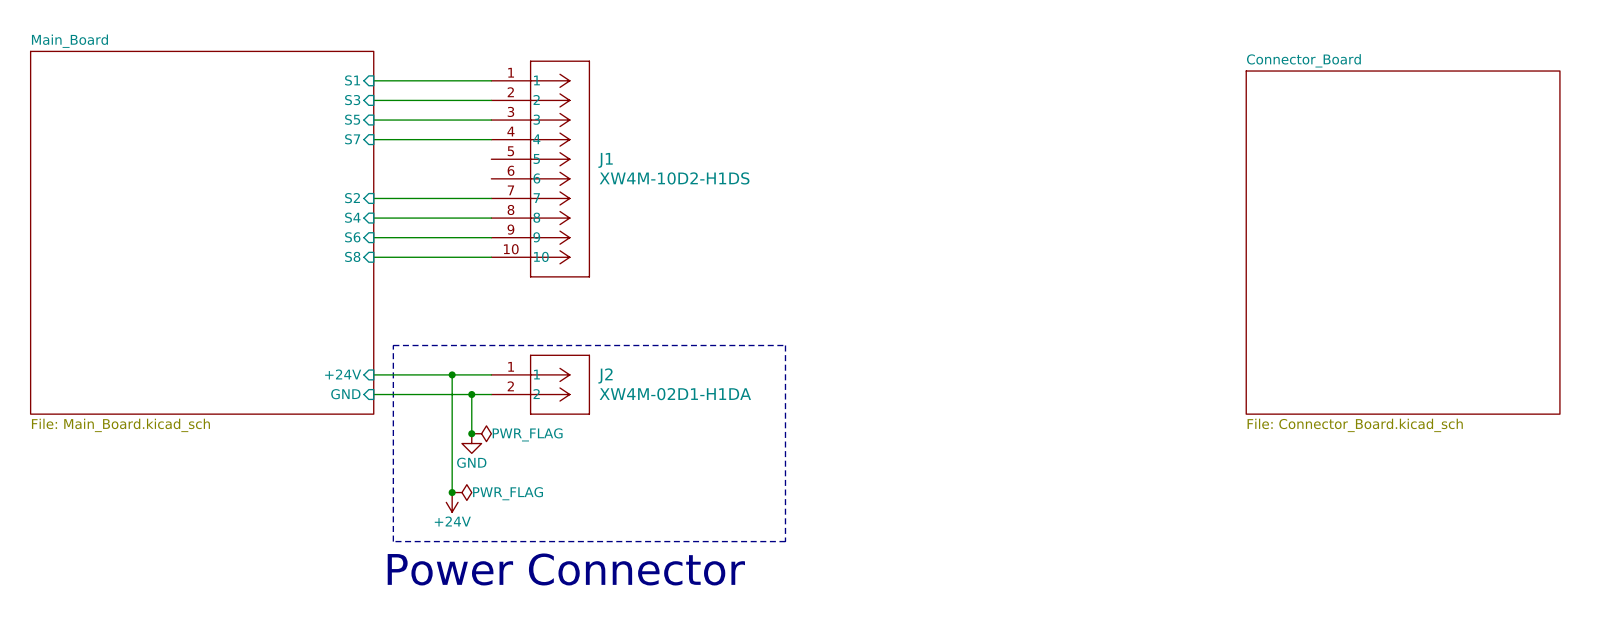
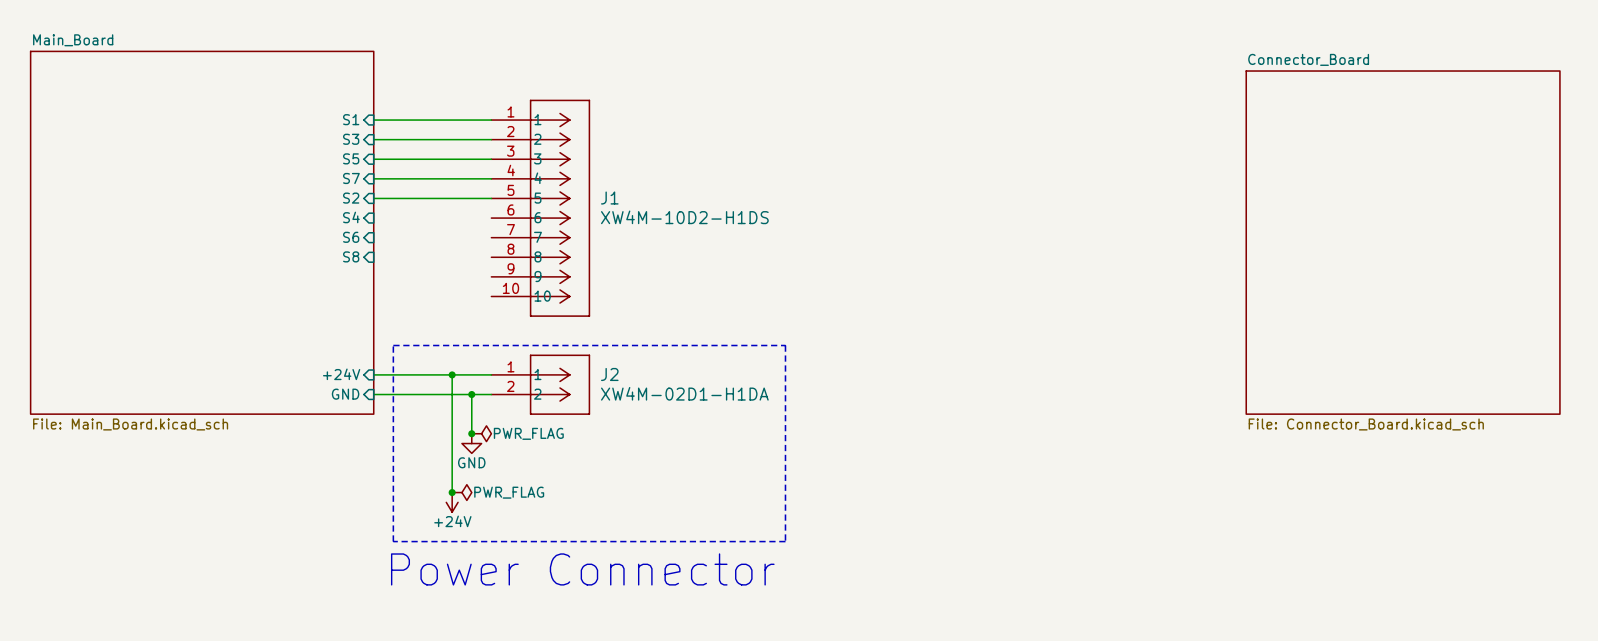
sheet pin: S1 (352, 80) -> none
wire: (373, 80) (491, 80) -> none
sheet pin: S3 (352, 100) -> none
wire: (373, 100) (491, 100) -> none
sheet pin: S5 (352, 119) -> S1 (351, 119)
sheet pin: S7 (352, 139) -> S3 (351, 139)
sheet pin: none -> S5 (351, 158)
J1 position: (540, 169) -> (540, 208)
sheet pin: none -> S7 (351, 178)
wire: (373, 218) (491, 218) -> (373, 159) (491, 159)
wire: (373, 237) (491, 237) -> (373, 178) (491, 178)
wire: (373, 257) (491, 257) -> none

